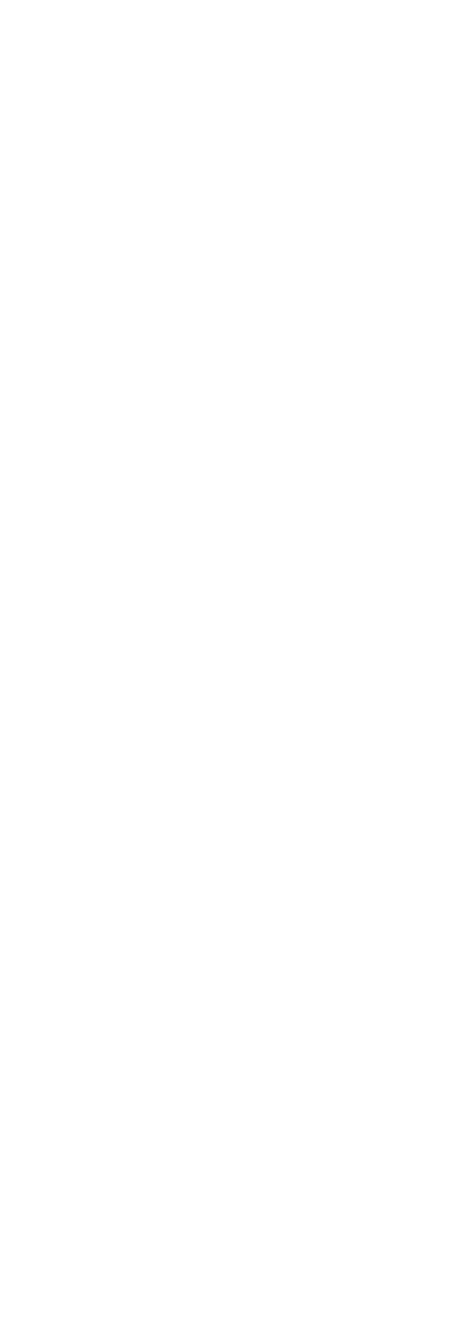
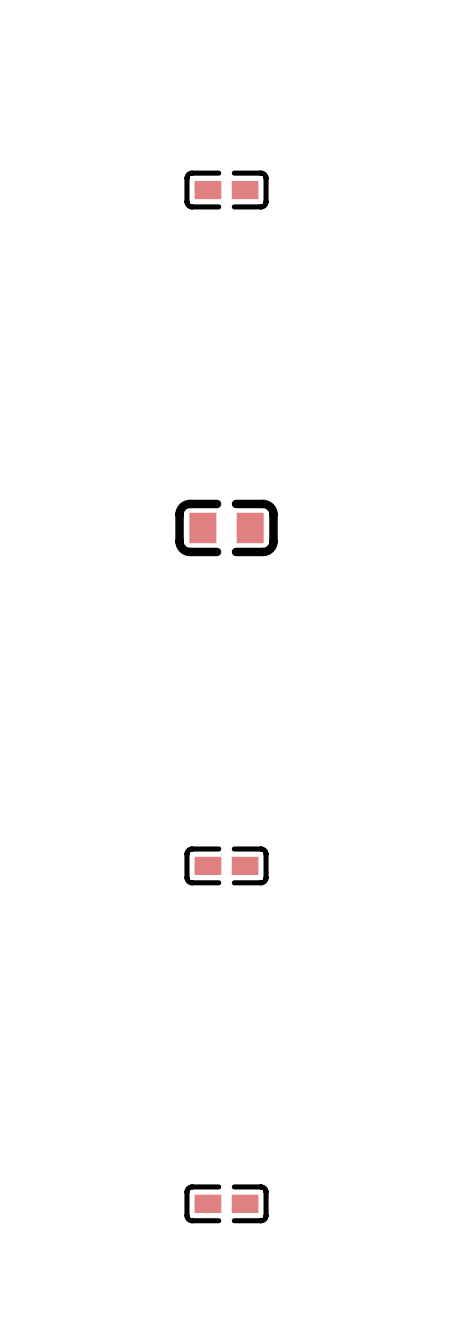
part: none -> (226, 190)
part: none -> (226, 527)
part: none -> (226, 865)
part: none -> (226, 1203)

